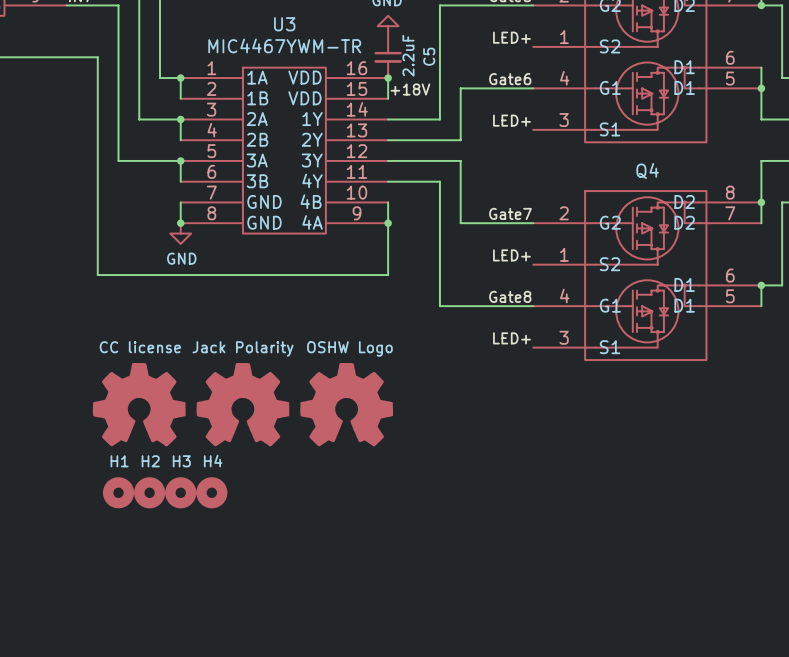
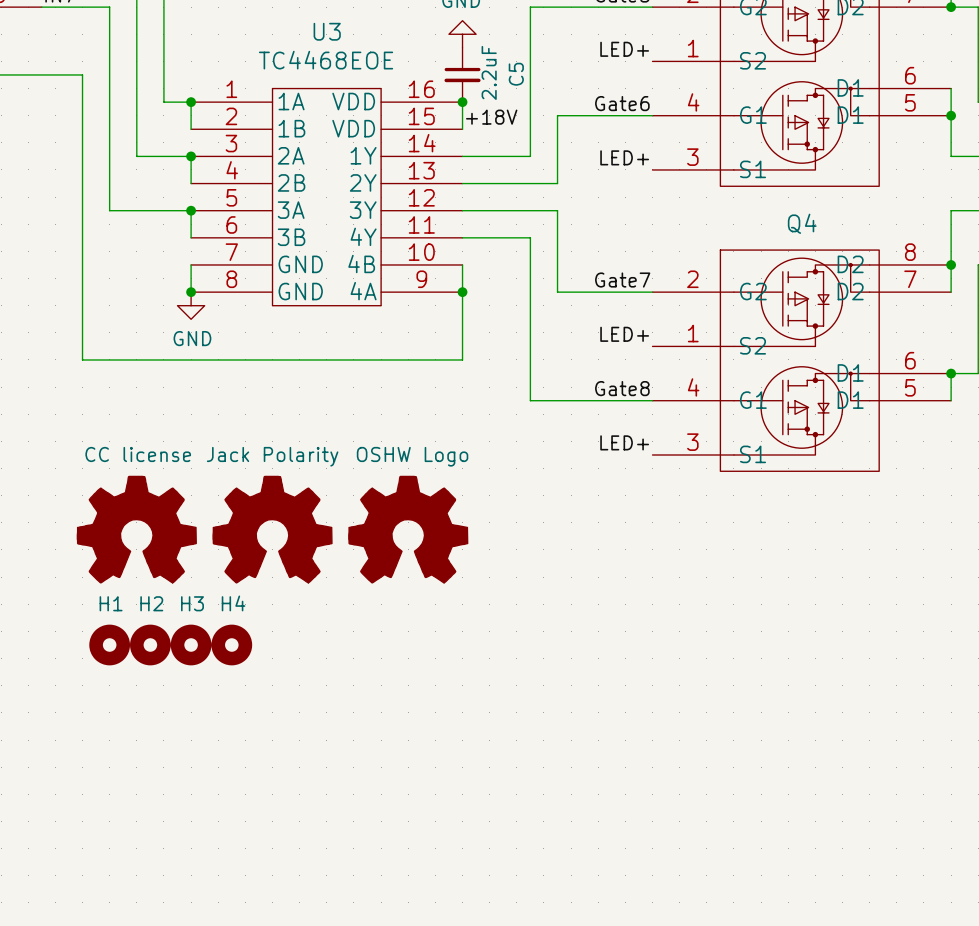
U3 value: MIC4467YWM-TR (284, 45) -> TC4468EOE (326, 60)

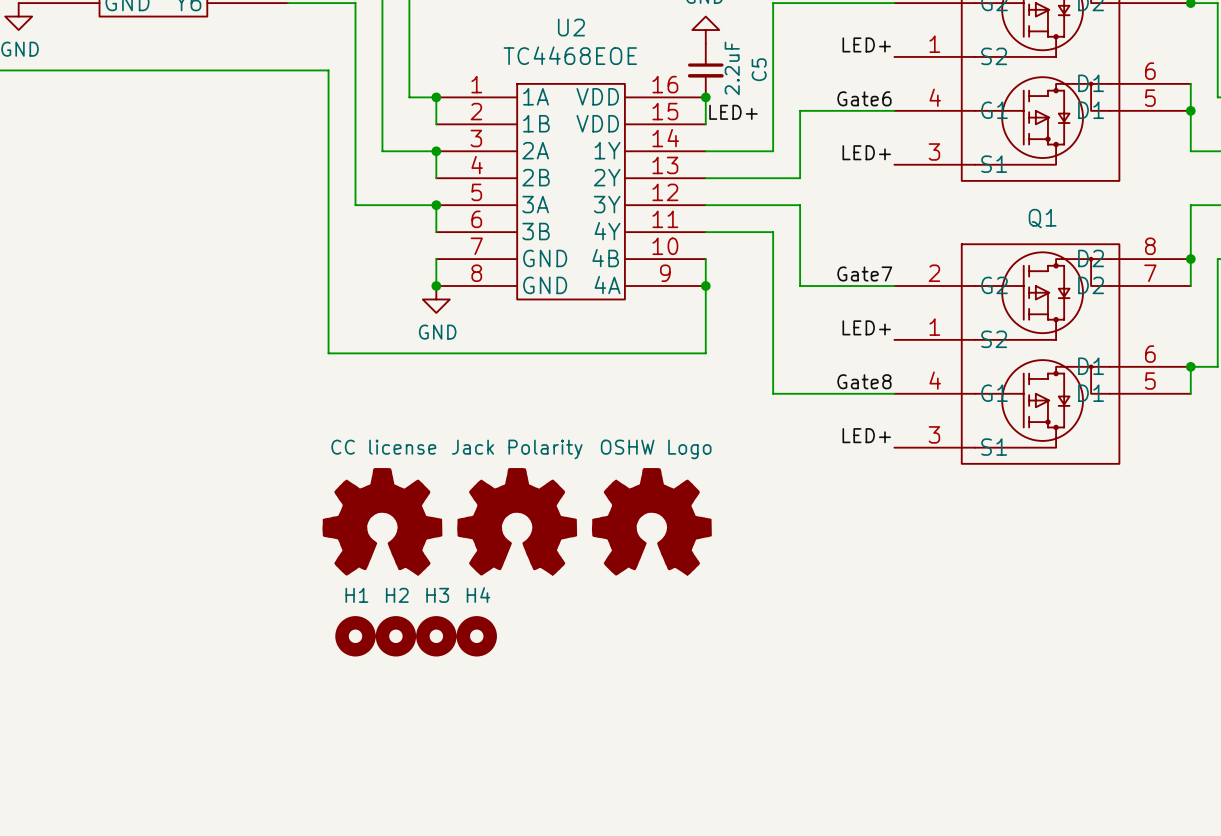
U3 name: U3 (327, 31) -> U2 (571, 27)
label: +18V (491, 117) -> LED+ (733, 112)
Q4 name: Q4 (802, 223) -> Q1 (1042, 218)

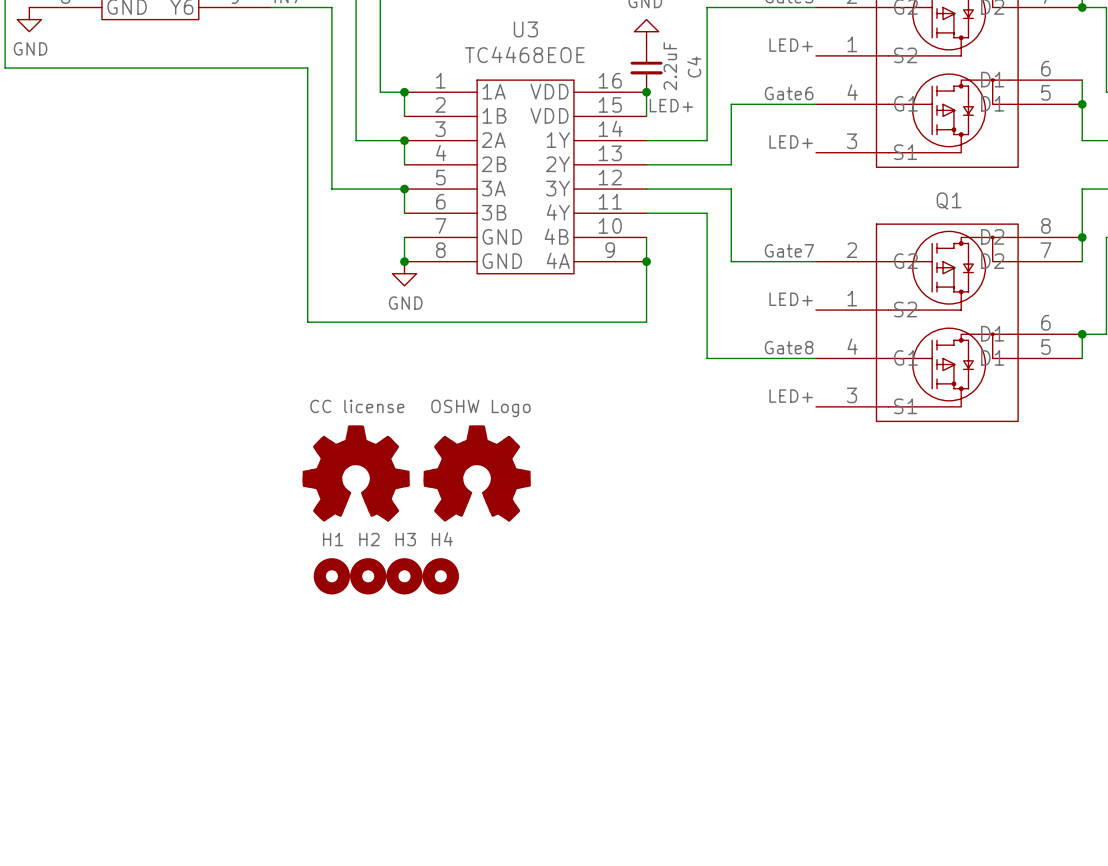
U2 name: U2 (571, 27) -> U3 (525, 29)
C5 name: C5 (759, 69) -> C4 (694, 67)
part value: Jack Polarity (517, 449) -> OSHW Logo (480, 408)
part: OSHW Logo (651, 521) -> none

